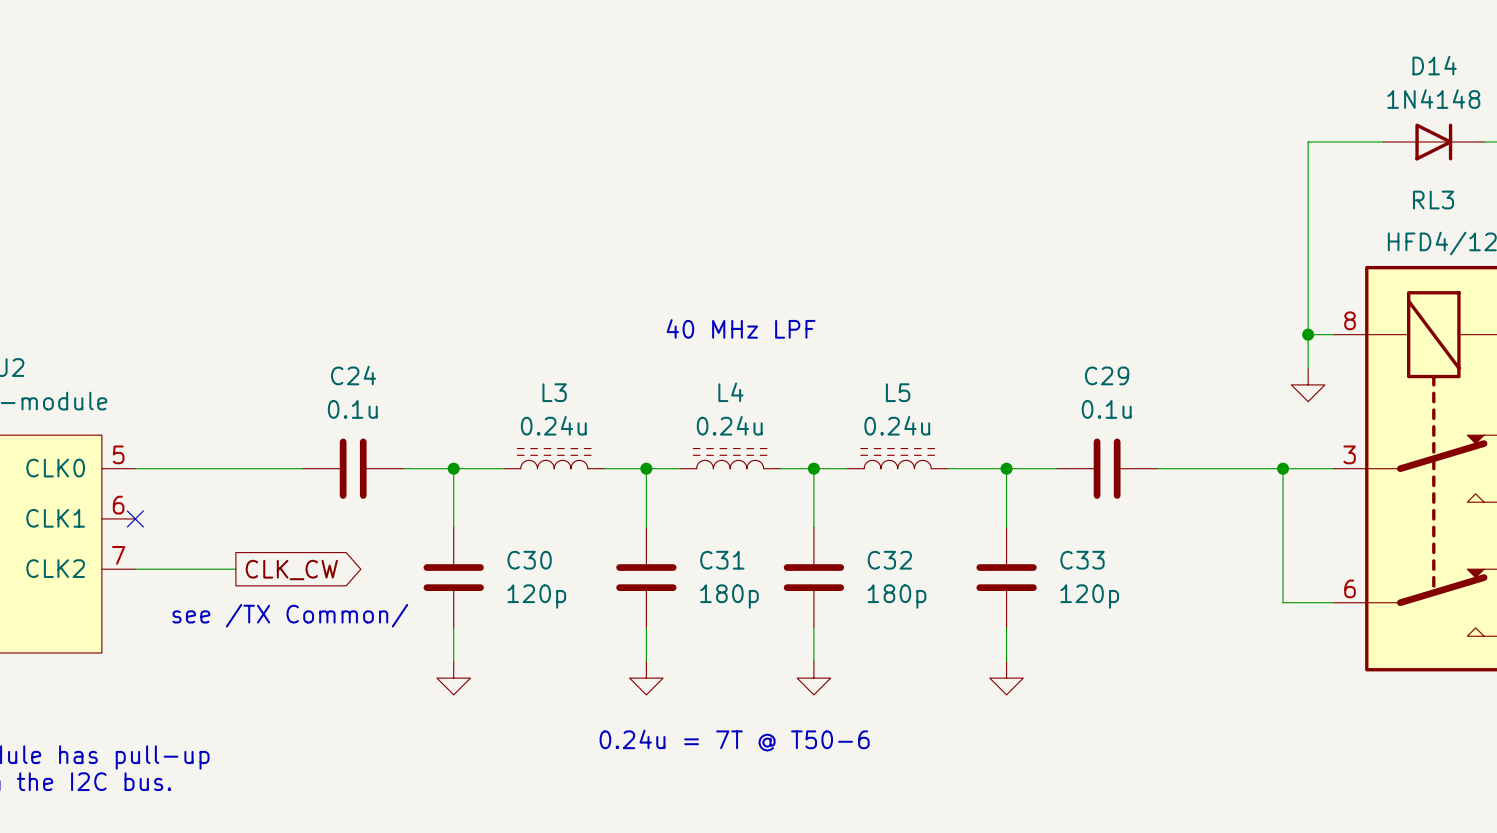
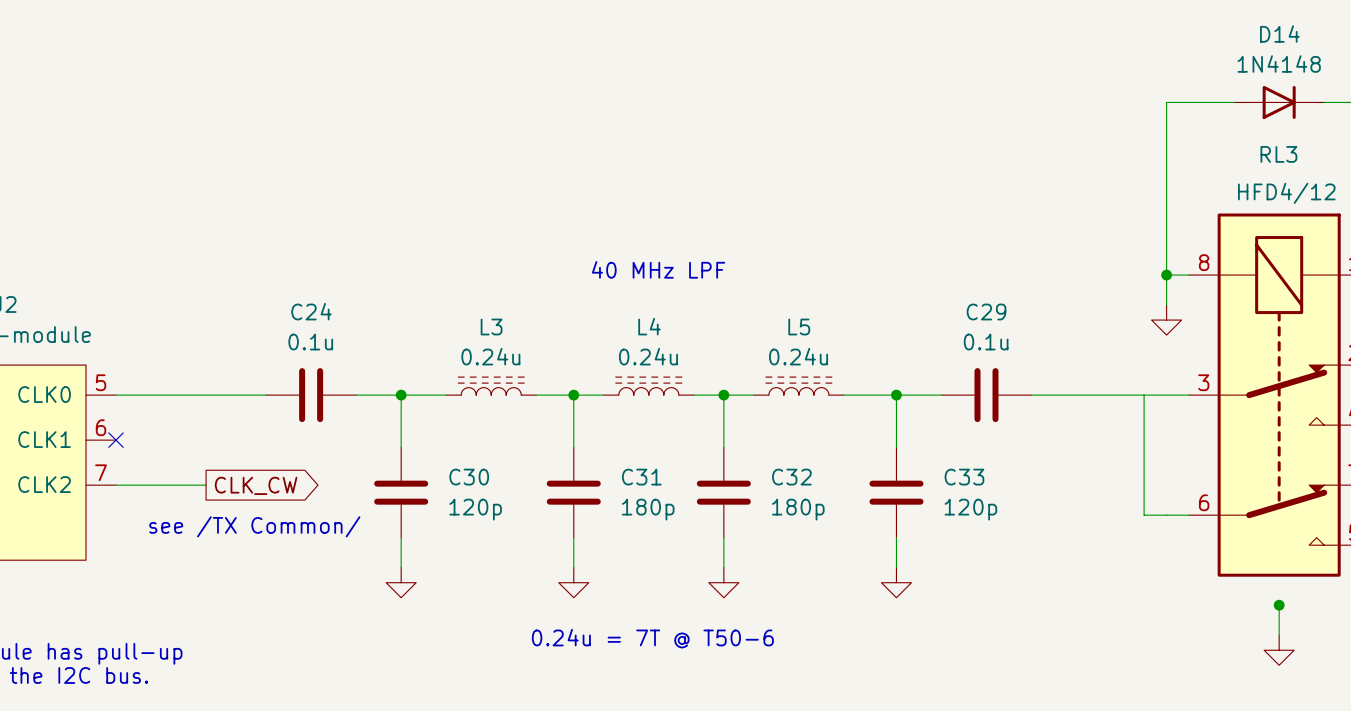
junction: (1283, 468) -> none
wire: none -> (1279, 605) (1279, 635)
junction: none -> (1279, 605)
power symbol: none -> (1279, 650)

